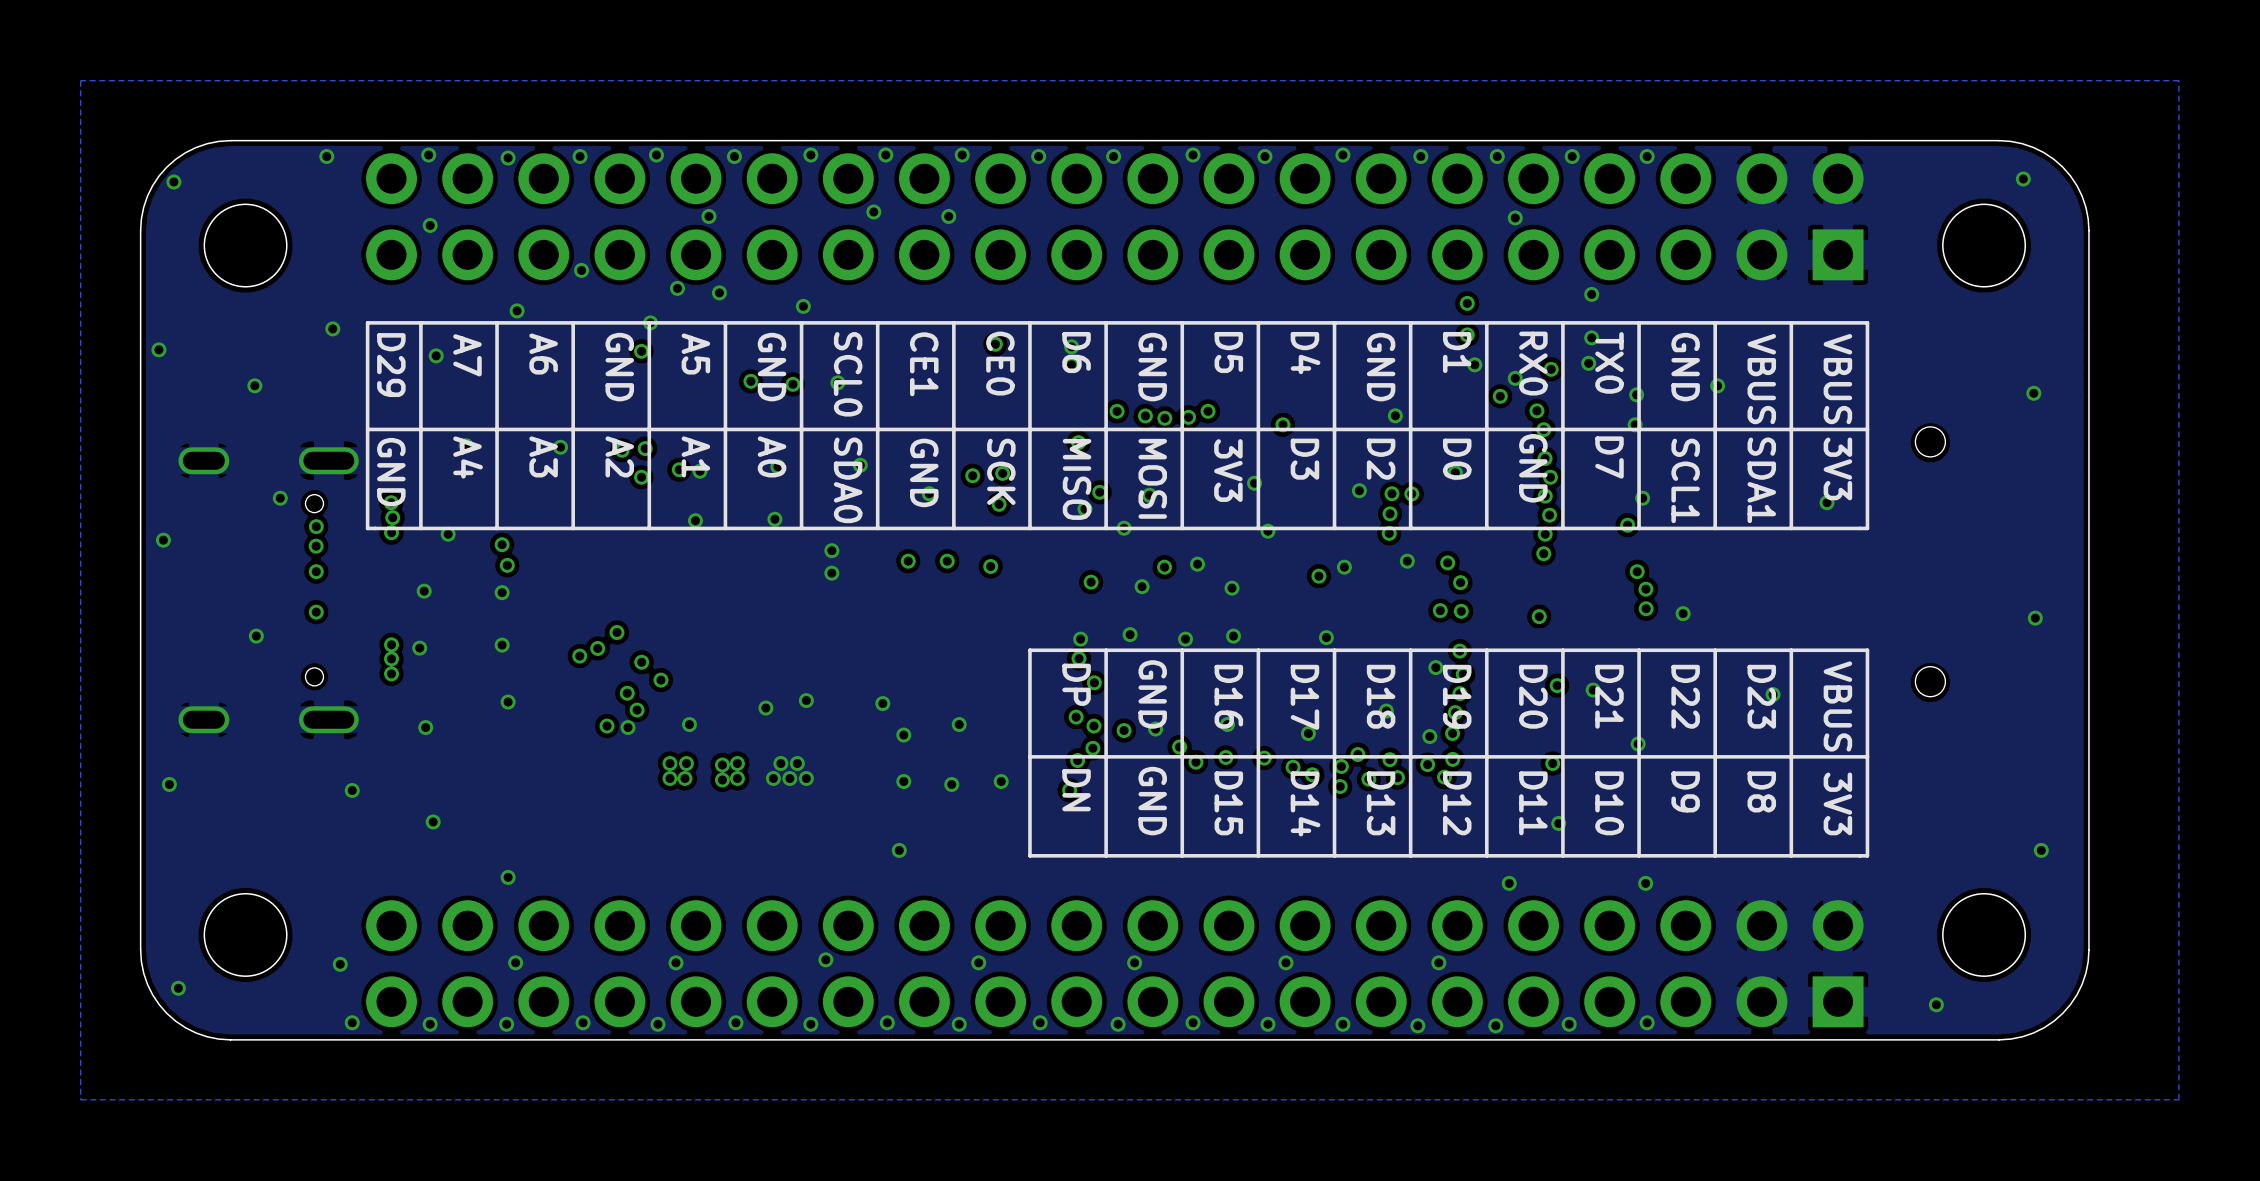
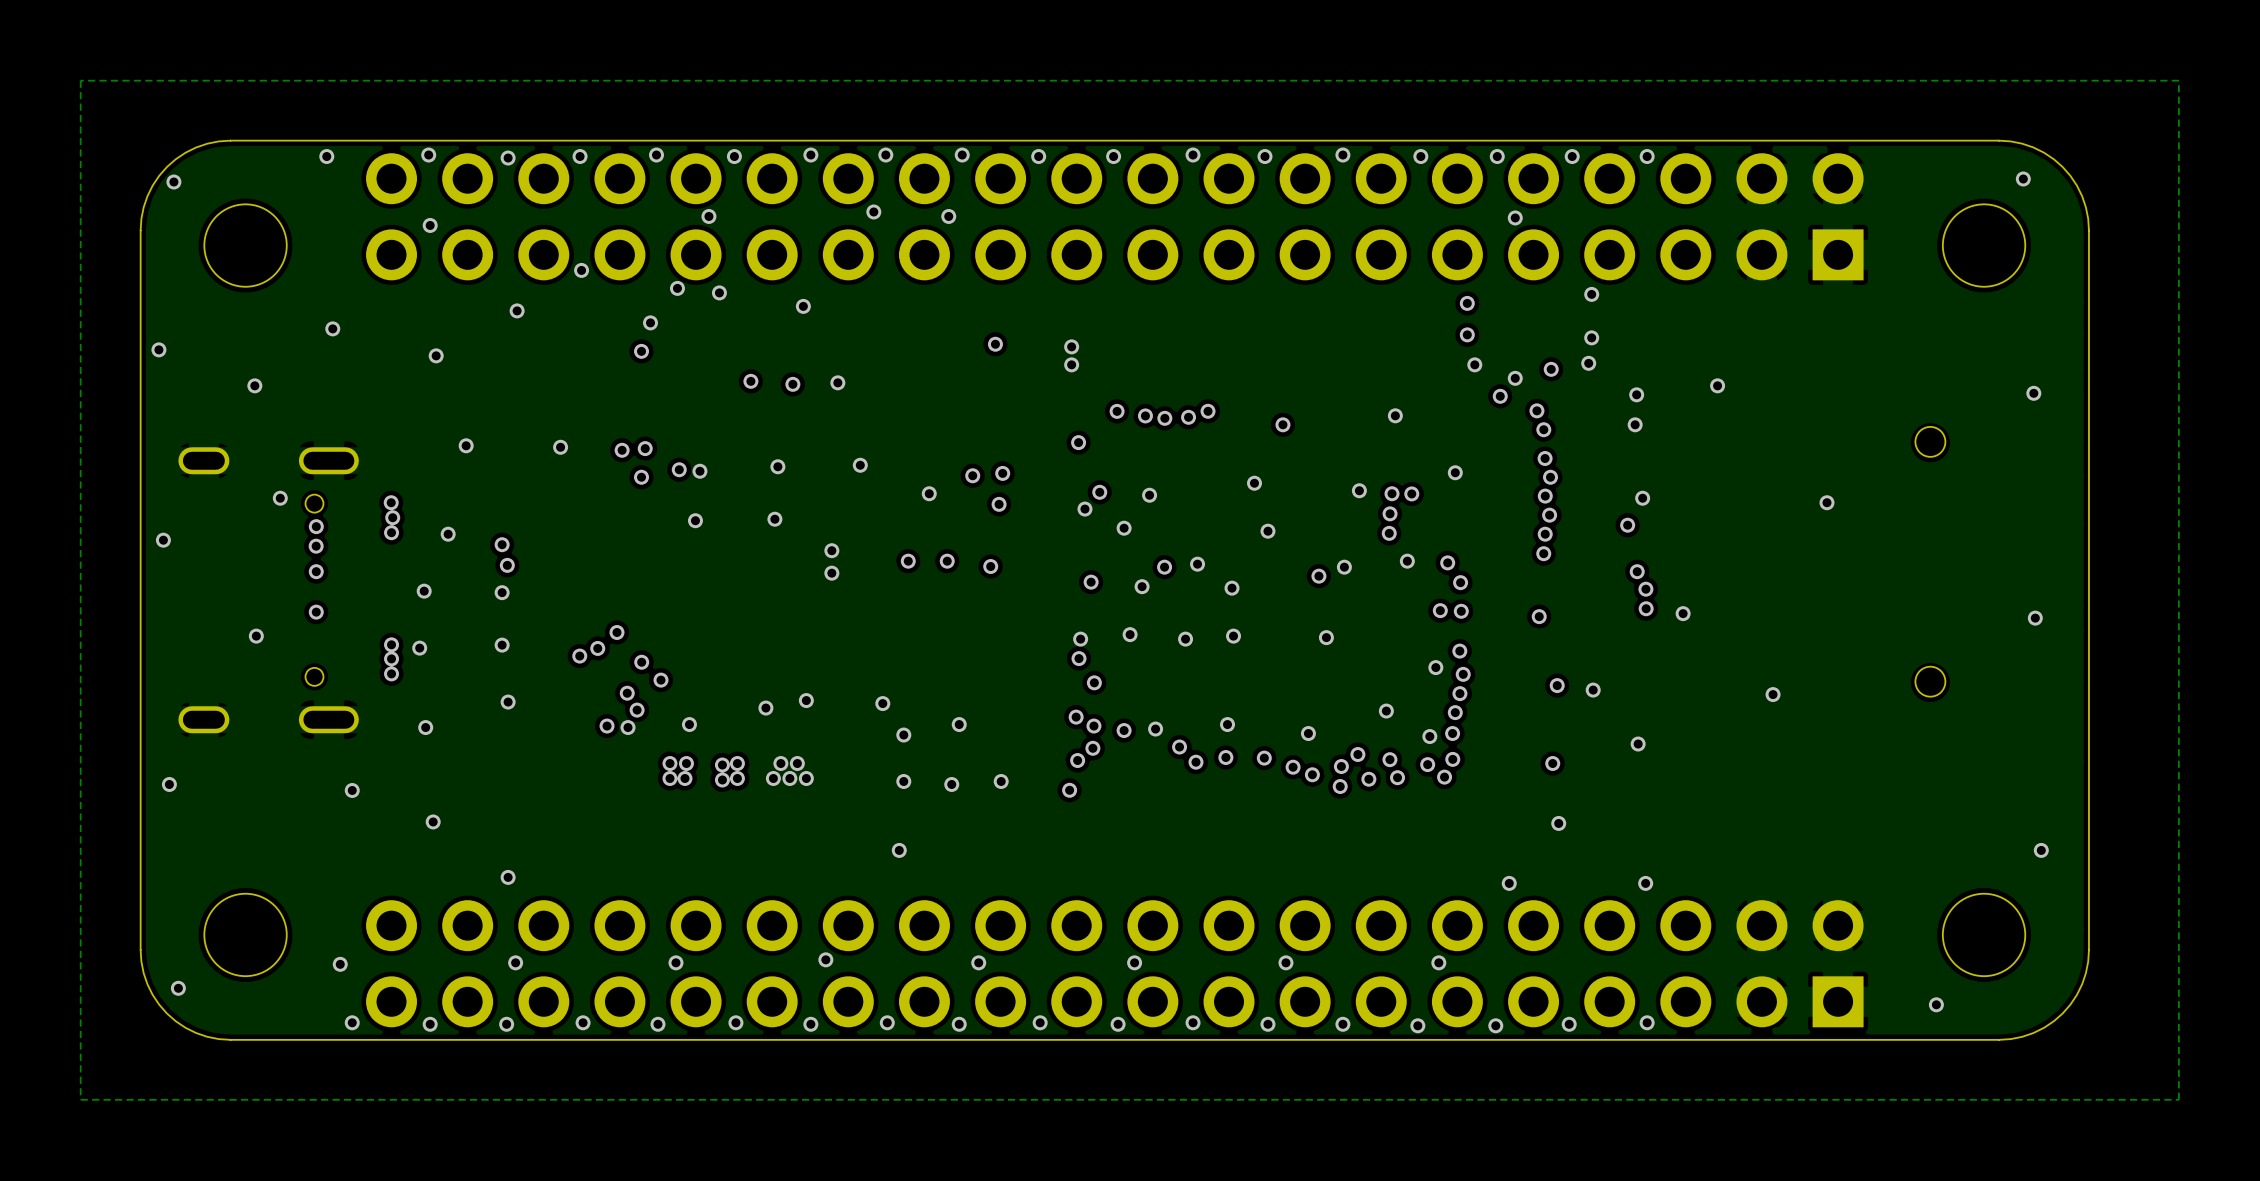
line: (420, 322) (420, 528) -> none
line: (497, 322) (497, 528) -> none
line: (573, 322) (573, 528) -> none
line: (649, 322) (649, 528) -> none
line: (725, 322) (725, 528) -> none
line: (801, 322) (801, 528) -> none
line: (877, 322) (877, 528) -> none
line: (953, 322) (953, 528) -> none
line: (1029, 322) (1029, 528) -> none
line: (1106, 322) (1106, 528) -> none
line: (1182, 322) (1182, 528) -> none
line: (1258, 322) (1258, 528) -> none
line: (1334, 322) (1334, 528) -> none
line: (1410, 322) (1410, 528) -> none
line: (1486, 322) (1486, 528) -> none
line: (1562, 322) (1562, 528) -> none
line: (1639, 322) (1639, 528) -> none
line: (1715, 322) (1715, 528) -> none
line: (1791, 322) (1791, 528) -> none
line: (1867, 322) (1867, 528) (367, 528) (367, 322) (1867, 322) -> none
text: D6 (1076, 352) -> none
text: D5 (1228, 352) -> none
text: D1 (1457, 352) -> none
text: D4 (1305, 353) -> none
text: A6 (543, 354) -> none
text: A5 (695, 354) -> none
text: A7 (467, 355) -> none
text: TX0 (1609, 362) -> none
text: CE0 (1000, 363) -> none
text: RX0 (1533, 363) -> none
text: CE1 (924, 364) -> none
text: D29 (391, 365) -> none
text: GND (619, 367) -> none
text: GND (772, 367) -> none
text: GND (1152, 367) -> none
text: GND (1381, 367) -> none
text: GND (1685, 367) -> none
text: SCL0 (848, 374) -> none
text: VBUS (1761, 379) -> none
text: VBUS (1837, 379) -> none
line: (1867, 429) (367, 429) -> none
text: A3 (543, 456) -> none
text: A2 (619, 456) -> none
text: A1 (695, 456) -> none
text: A0 (772, 456) -> none
text: A4 (468, 457) -> none
text: D7 (1609, 457) -> none
text: D3 (1304, 459) -> none
text: D2 (1381, 459) -> none
text: D0 (1457, 459) -> none
text: GND (1533, 468) -> none
text: 3V3 (1837, 468) -> none
text: 3V3 (1228, 470) -> none
text: SCK (1001, 471) -> none
text: GND (391, 472) -> none
text: GND (924, 472) -> none
text: MOSI (1152, 478) -> none
text: MISO (1077, 479) -> none
text: SDA0 (848, 480) -> none
text: SCL1 (1685, 480) -> none
text: SDA1 (1761, 480) -> none
line: (1106, 650) (1106, 855) -> none
line: (1182, 650) (1182, 855) -> none
line: (1258, 650) (1258, 855) -> none
line: (1334, 650) (1334, 855) -> none
line: (1410, 650) (1410, 855) -> none
line: (1486, 650) (1486, 855) -> none
line: (1562, 650) (1562, 855) -> none
line: (1639, 650) (1639, 855) -> none
line: (1715, 650) (1715, 855) -> none
line: (1791, 650) (1791, 855) -> none
line: (1867, 650) (1867, 855) (1029, 855) (1029, 650) (1867, 650) -> none
text: DP (1076, 684) -> none
text: GND (1152, 694) -> none
text: D16 (1228, 696) -> none
text: D18 (1381, 696) -> none
text: D19 (1457, 696) -> none
text: D20 (1533, 696) -> none
text: D21 (1609, 696) -> none
text: D22 (1685, 696) -> none
text: D23 (1761, 696) -> none
text: D17 (1304, 697) -> none
text: VBUS (1837, 706) -> none
line: (1867, 756) (1029, 756) -> none
text: DN (1076, 790) -> none
text: D9 (1685, 791) -> none
text: D8 (1761, 791) -> none
text: GND (1152, 801) -> none
text: D15 (1228, 803) -> none
text: D14 (1305, 803) -> none
text: D13 (1381, 803) -> none
text: D12 (1457, 803) -> none
text: D11 (1533, 803) -> none
text: D10 (1609, 803) -> none
text: 3V3 (1837, 803) -> none

